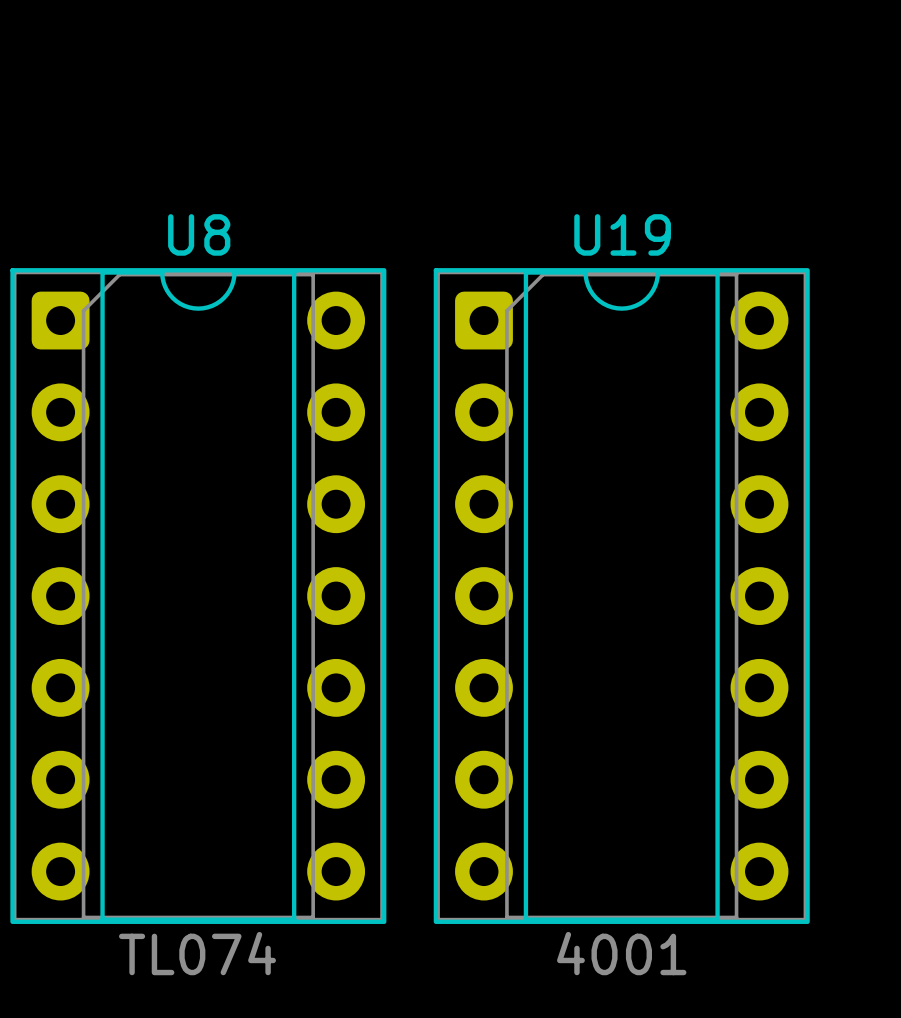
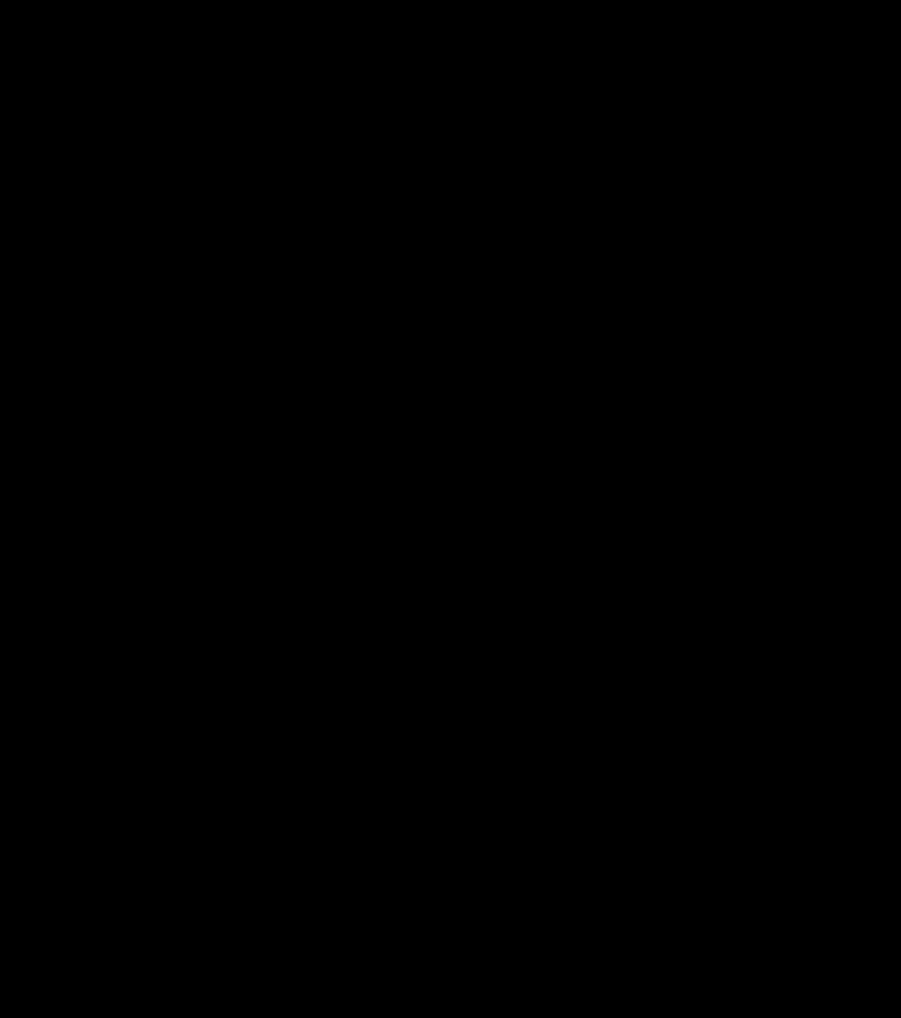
U8: TL074 (198, 596) -> none
U19: 4001 (621, 596) -> none

